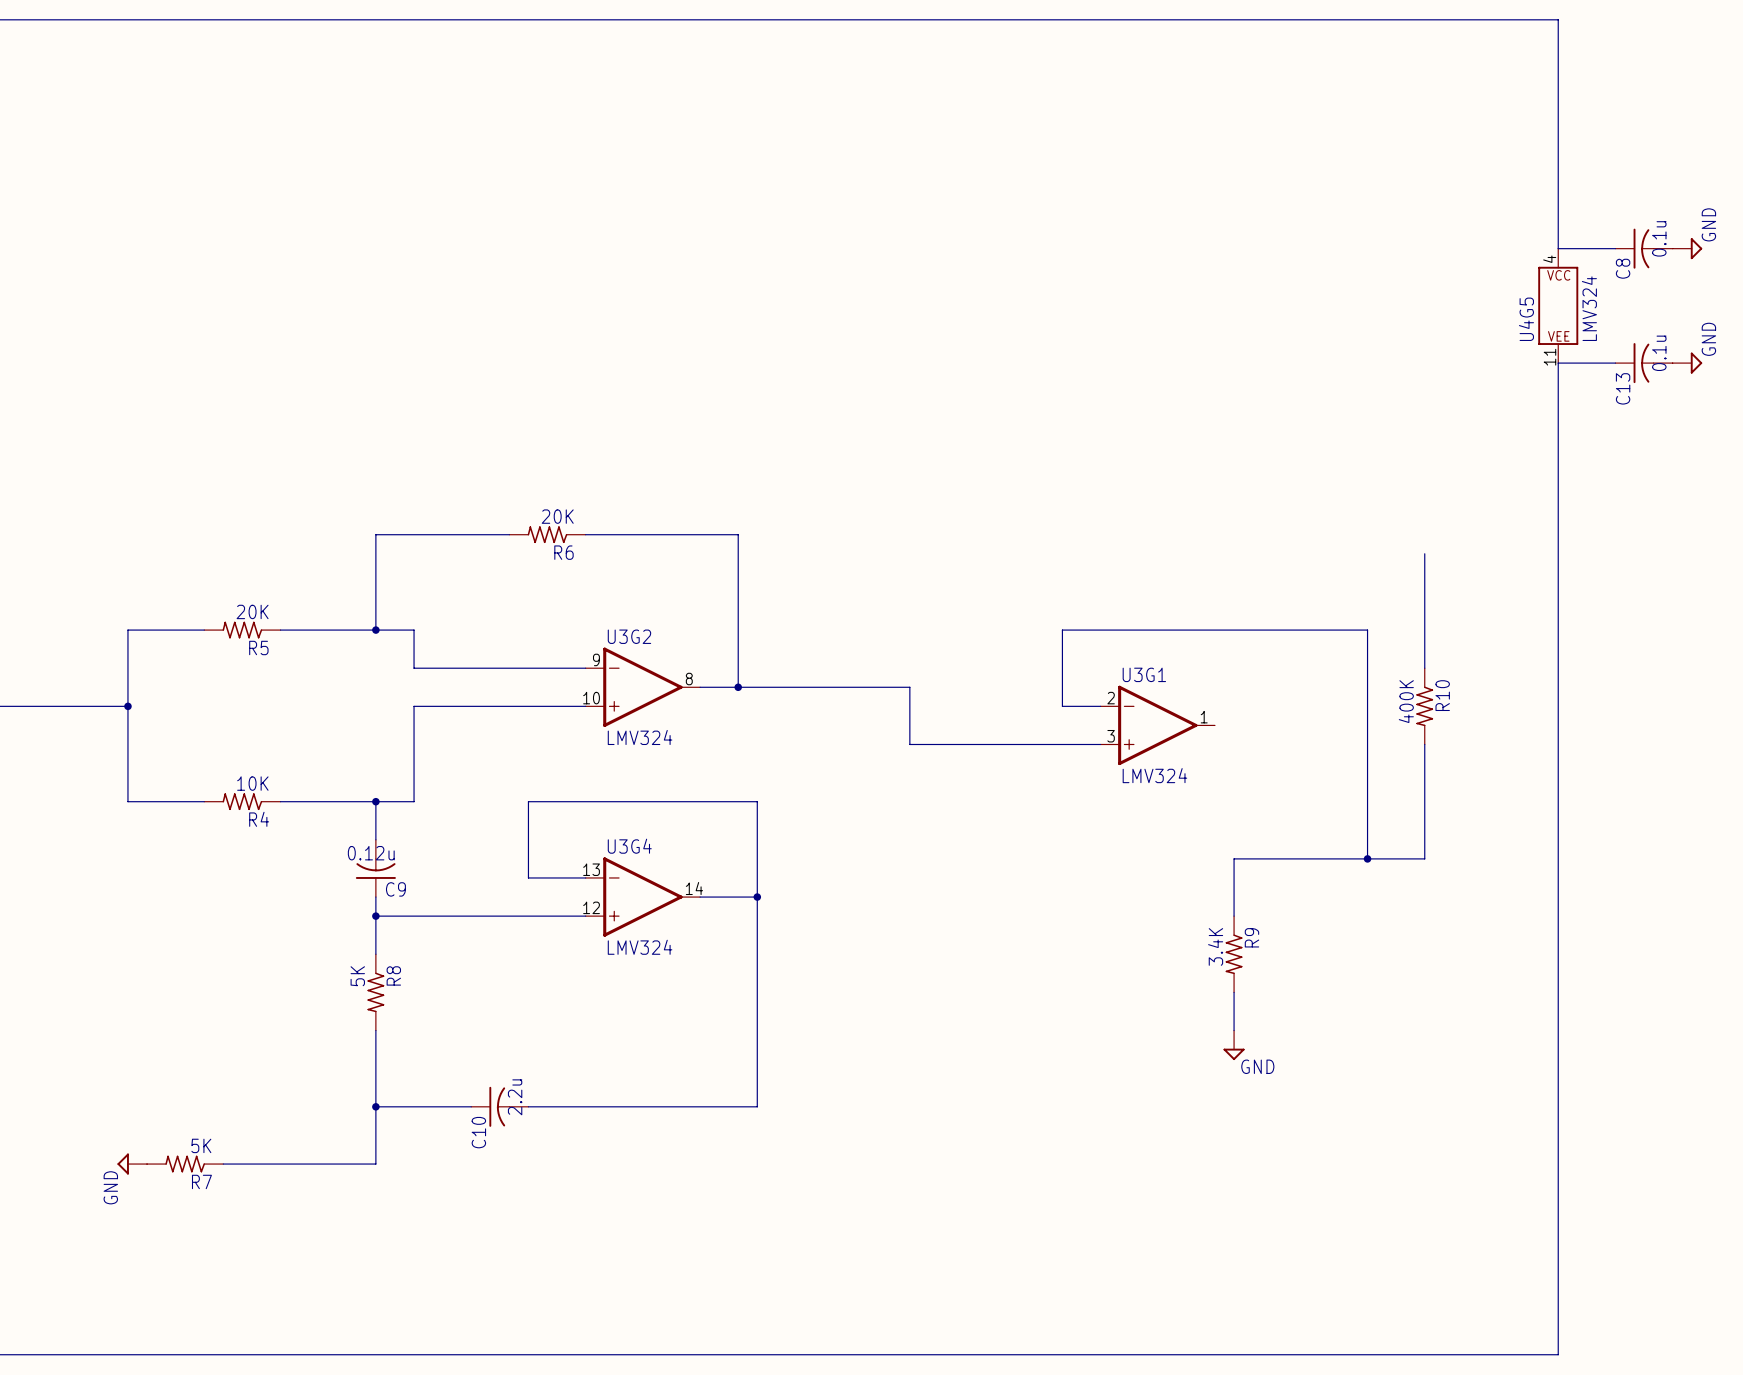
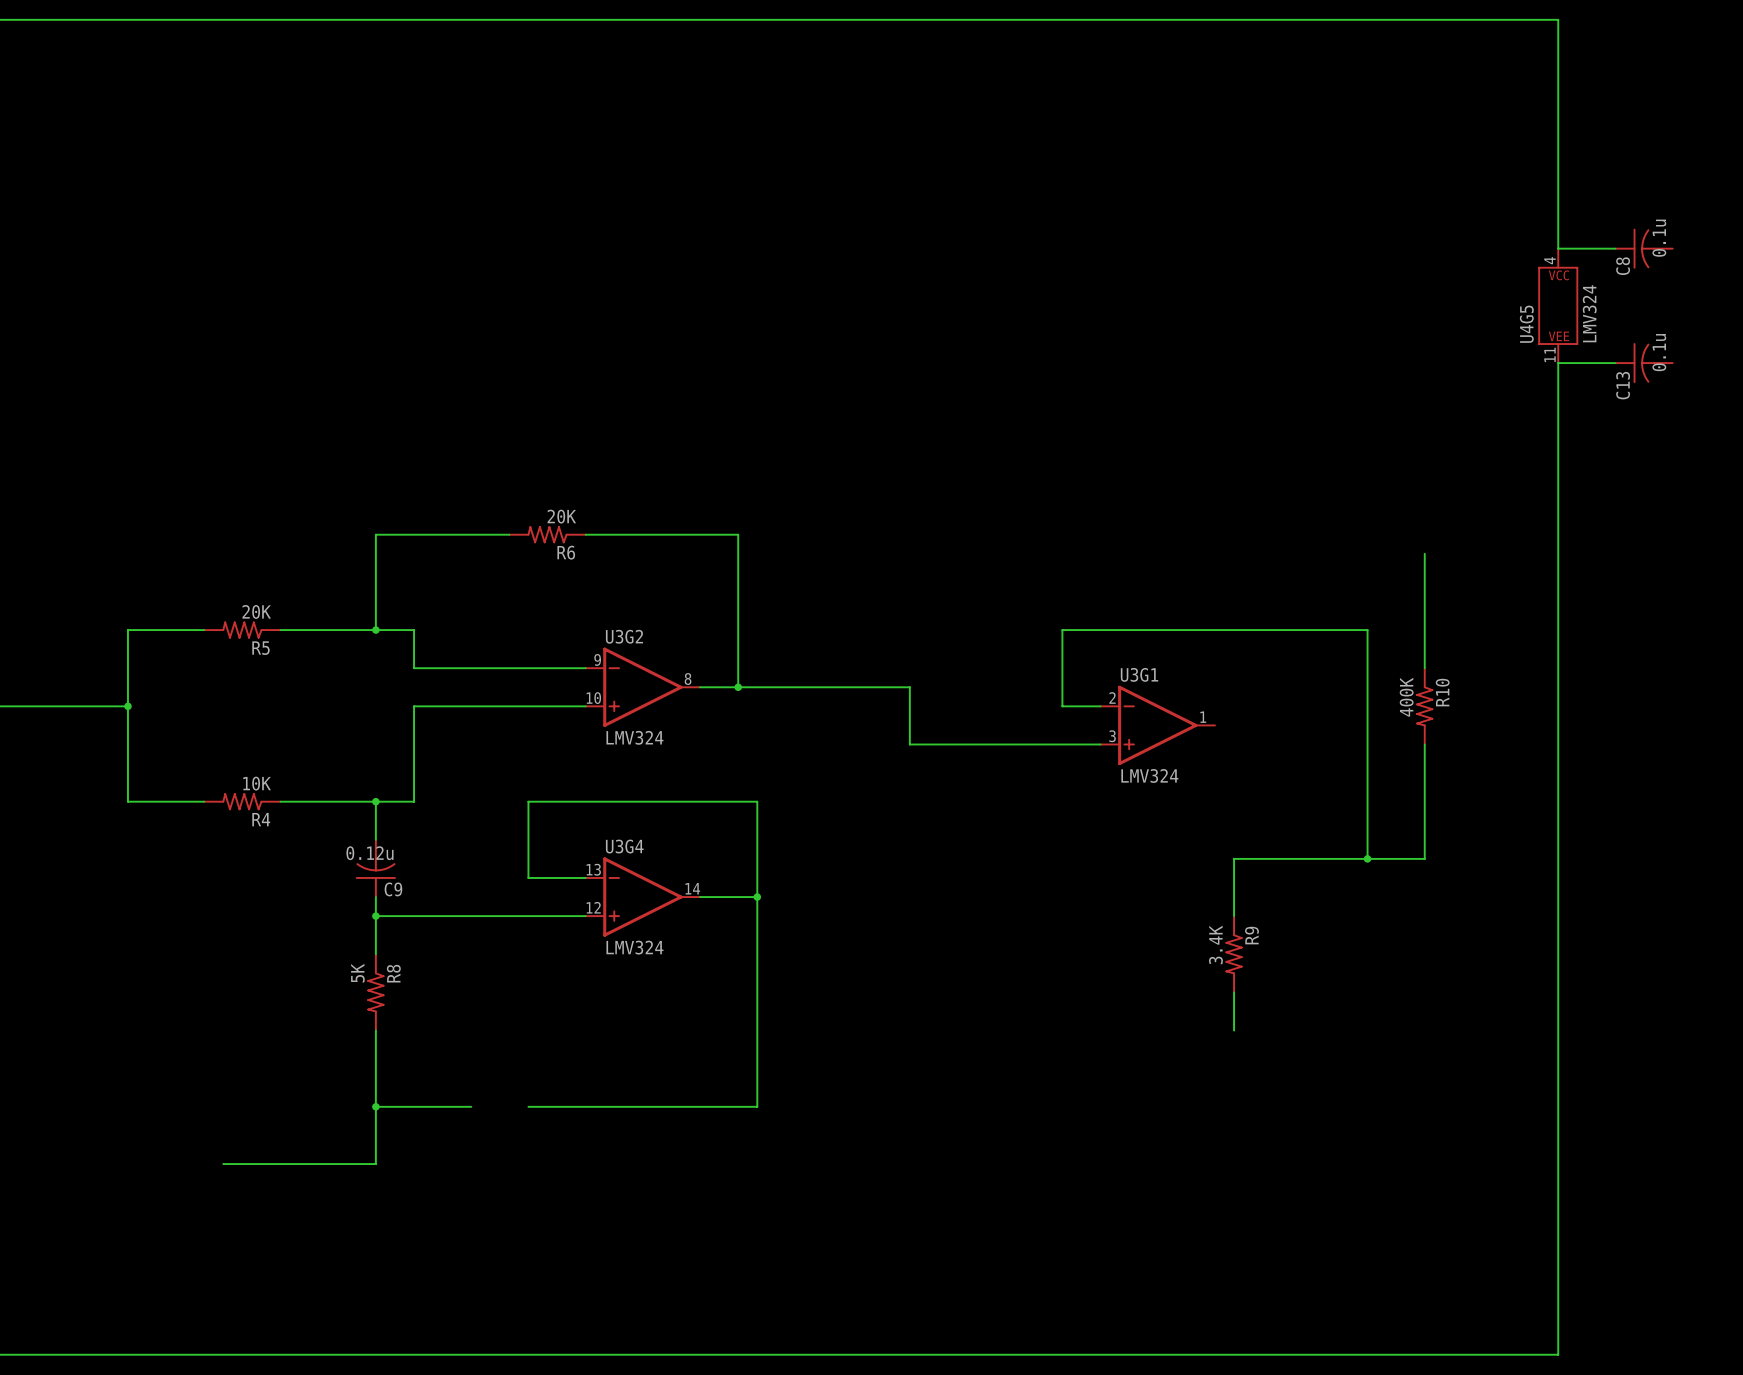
power symbol: GND (1687, 248) -> none
power symbol: GND (1687, 363) -> none
power symbol: GND (1234, 1045) -> none
C10: 2.2u (499, 1106) -> none
power symbol: GND (132, 1164) -> none
R7: 5K (185, 1164) -> none

